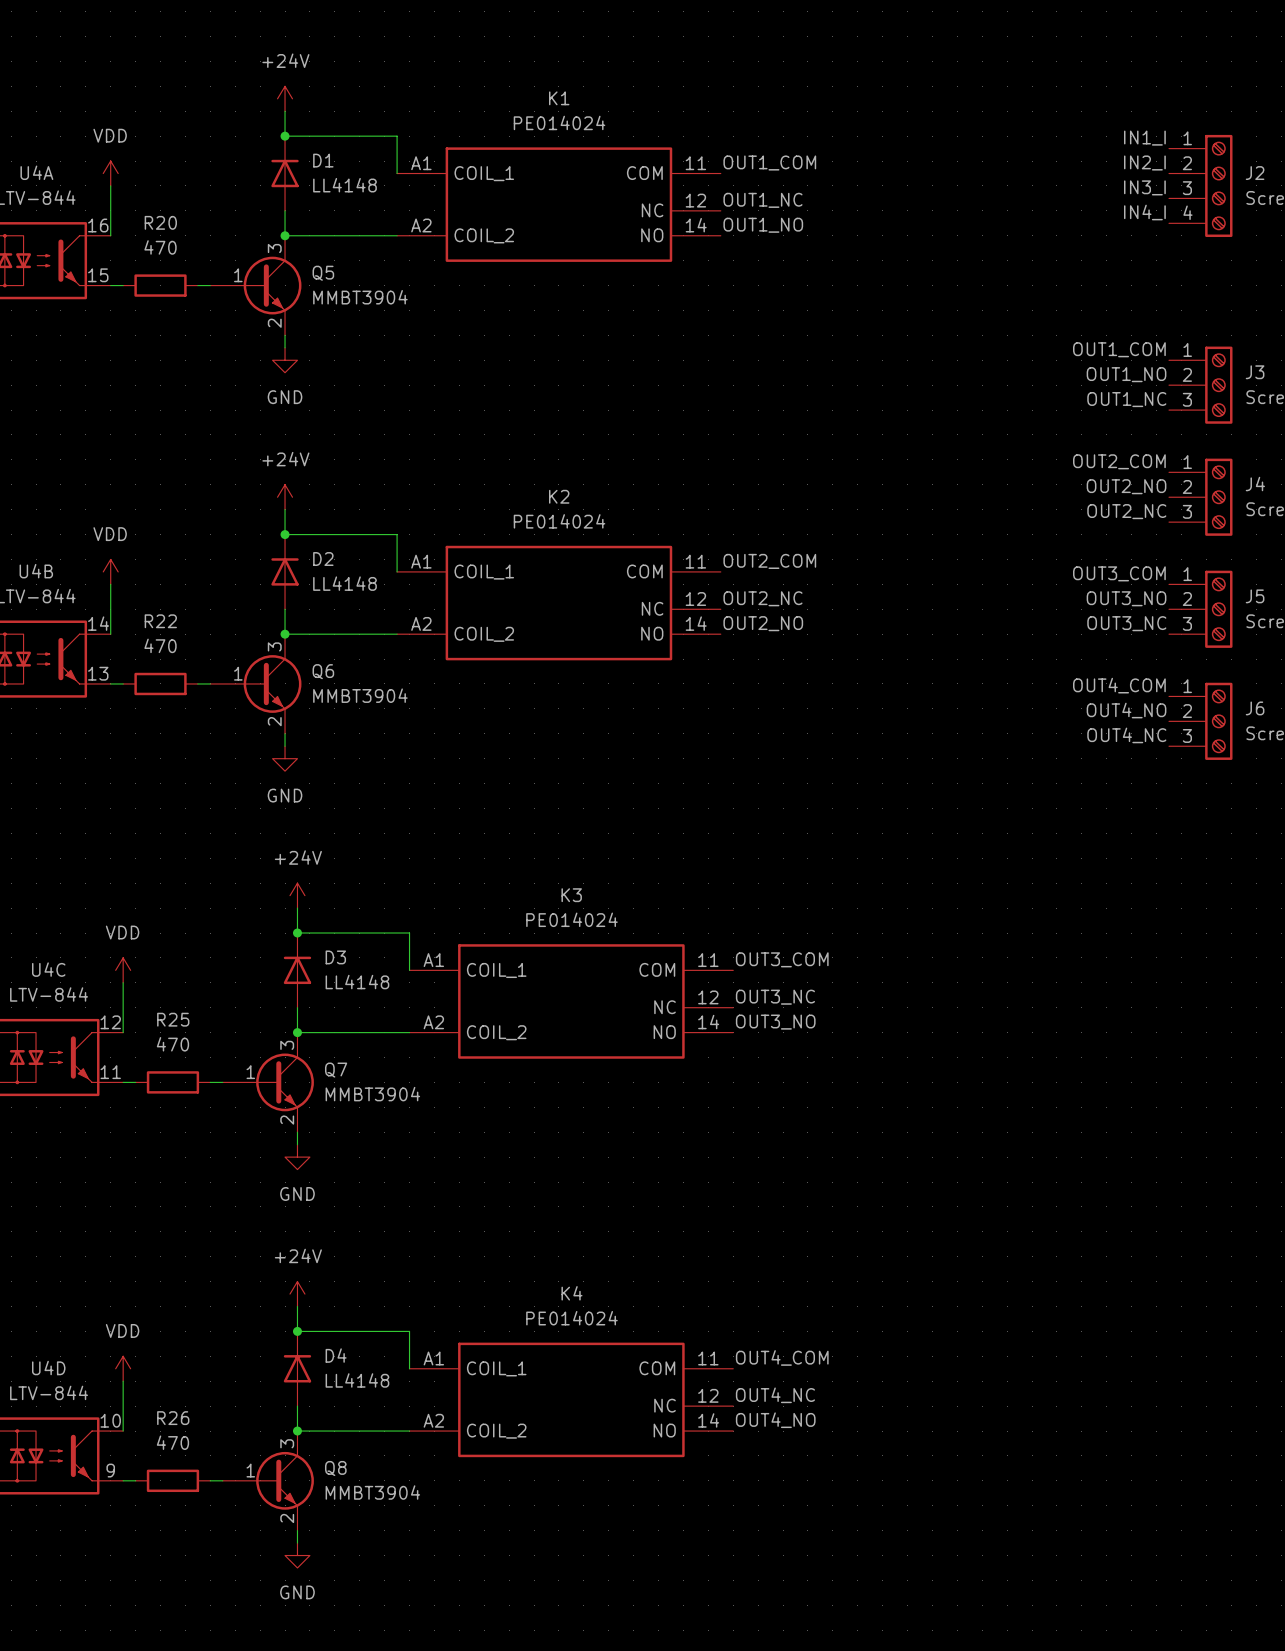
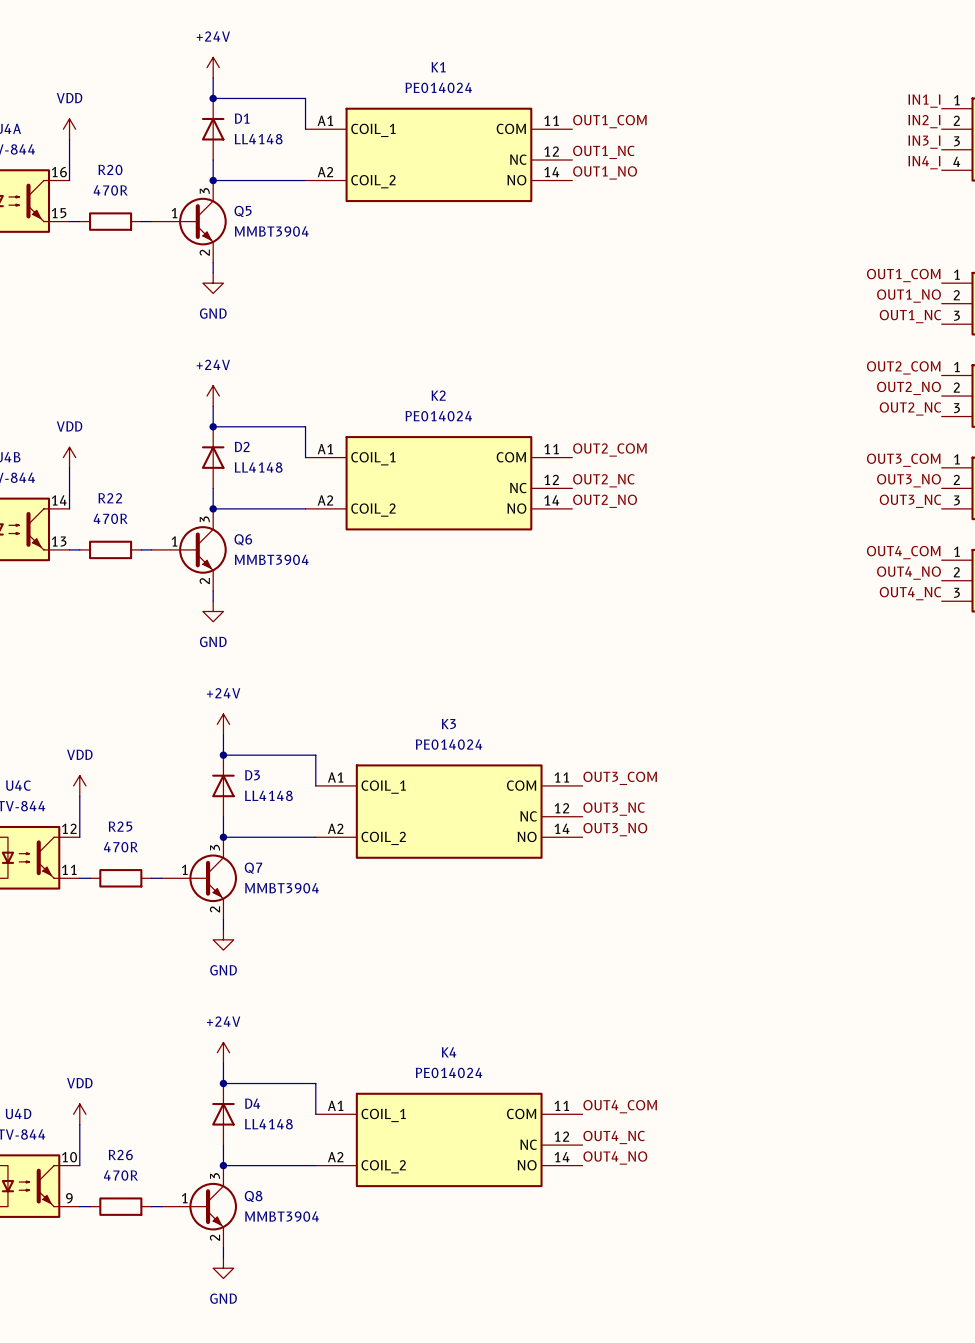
R20 value: 470 (160, 247) -> 470R (110, 190)
R22 value: 470 (160, 645) -> 470R (110, 518)
R25 value: 470 (172, 1044) -> 470R (120, 847)
R26 value: 470 (172, 1442) -> 470R (120, 1175)

